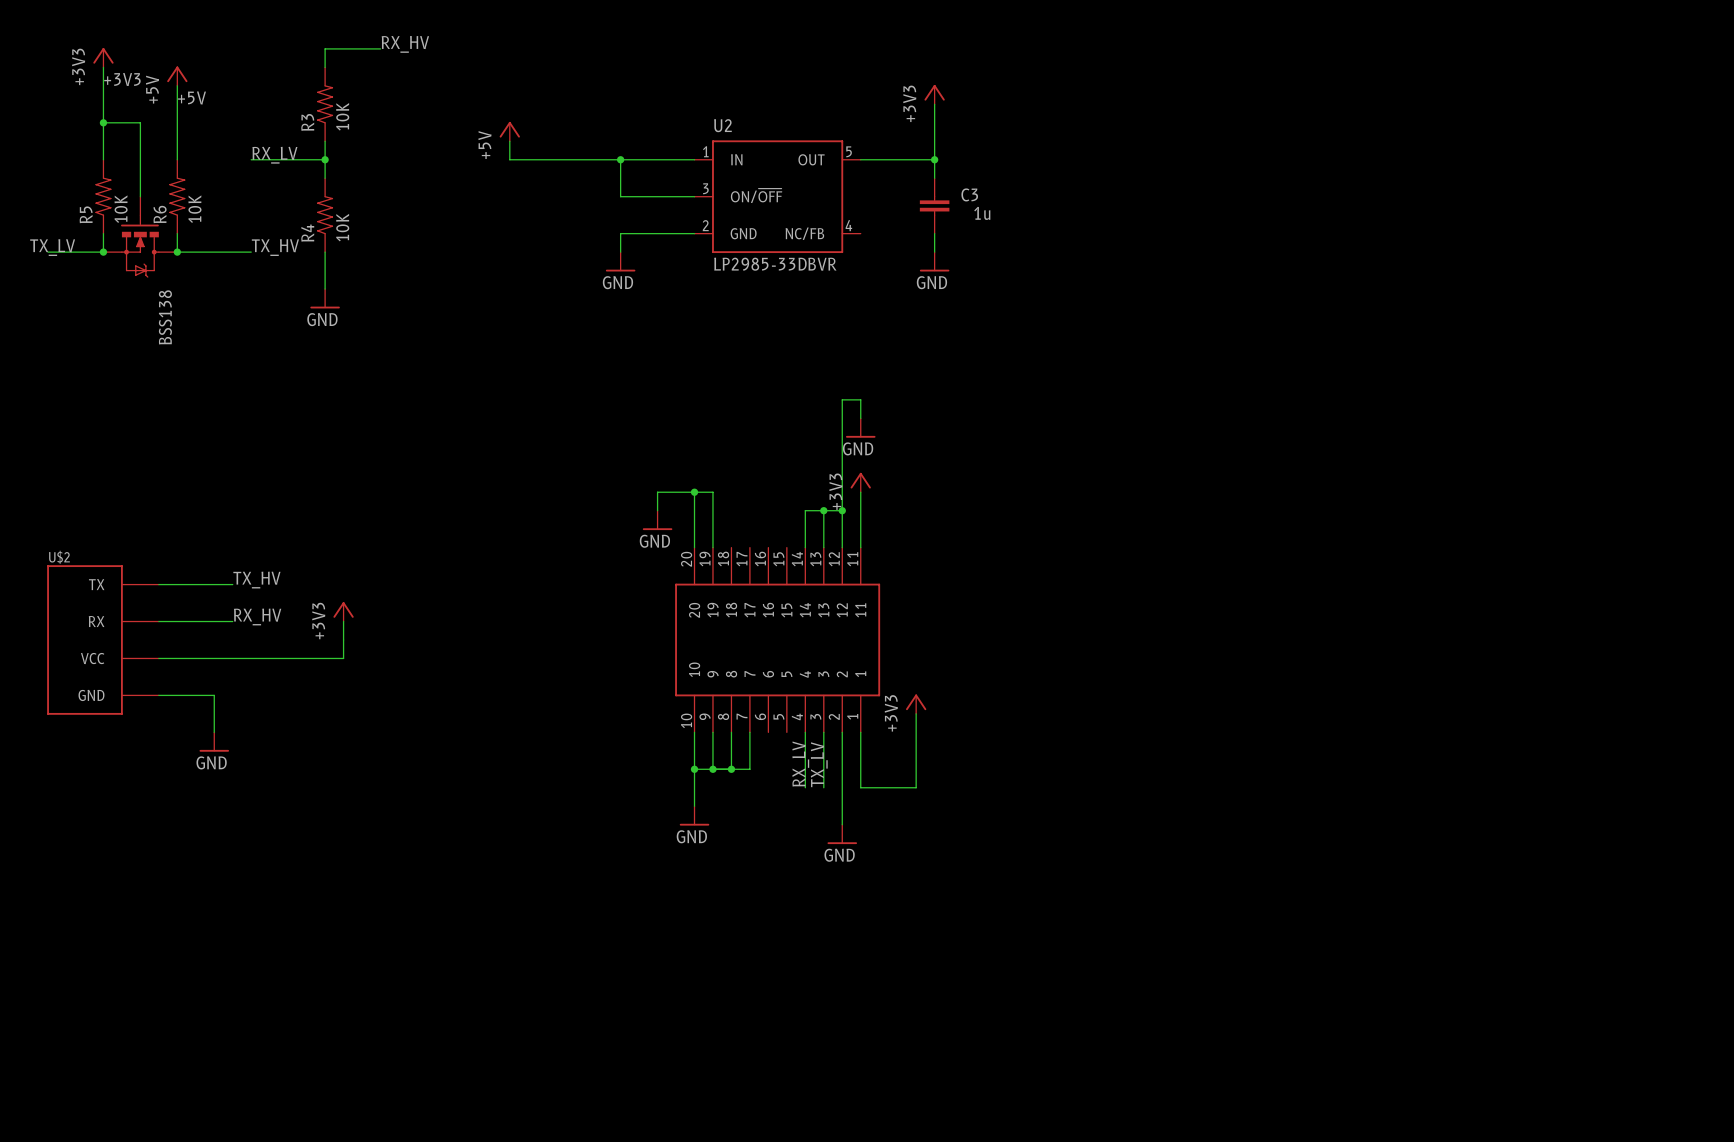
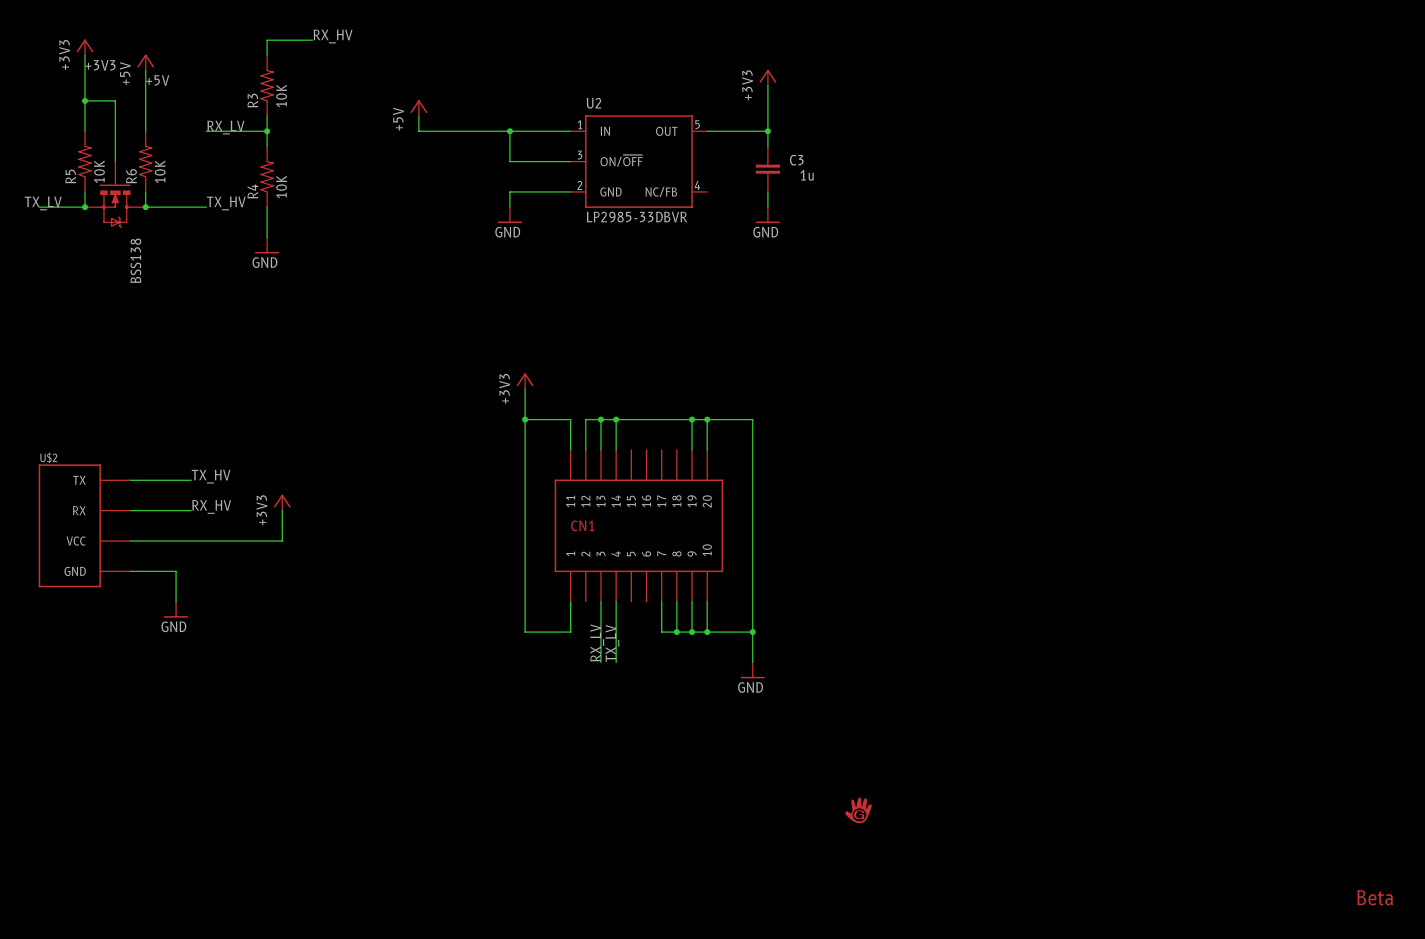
wire: (860, 418) (860, 399) (842, 399) (842, 510) -> (752, 586) (752, 419) (692, 419)
power symbol: GND (860, 428) -> none
power symbol: none -> +3V3 (525, 381)
wire: none -> (525, 389) (525, 632) (570, 632)
power symbol: +3V3 (860, 482) -> none
wire: (694, 492) (694, 510) -> (525, 419) (570, 419)
junction: (694, 492) -> none
wire: (860, 492) (860, 510) -> none
junction: none -> (525, 419)
wire: (657, 510) (657, 492) (712, 492) (712, 510) -> none
wire: none -> (600, 419) (600, 449)
junction: none -> (600, 419)
junction: none -> (616, 419)
wire: (805, 510) (805, 547) -> (661, 419) (585, 419)
wire: (823, 510) (823, 547) -> (616, 419) (616, 449)
junction: (823, 510) -> none
junction: none -> (707, 419)
power symbol: GND (657, 520) -> none
CN1 symbol: [675, 547, 881, 733] -> [554, 449, 724, 602]
CN1 name: none -> CN1 (582, 525)
power symbol: +3V3 (916, 704) -> none
wire: (712, 732) (712, 769) -> (600, 632) (600, 662)
label position: RX_LV (800, 764) -> RX_LV (597, 642)
label position: TX_LV (819, 764) -> TX_LV (612, 643)
junction: (694, 769) -> none
junction: (712, 769) -> none
junction: (731, 769) -> none
wire: (749, 769) (694, 769) (694, 806) -> (616, 632) (616, 662)
wire: (805, 769) (805, 787) -> (661, 632) (752, 632)
wire: (823, 769) (823, 787) -> none
junction: none -> (676, 632)
wire: (842, 769) (842, 824) -> none
junction: none -> (692, 632)
wire: (860, 769) (860, 787) (916, 787) -> (752, 662) (752, 647)
junction: none -> (707, 632)
junction: none -> (752, 632)
power symbol: GND (694, 815) -> none
power symbol position: GND (842, 834) -> GND (752, 670)
part: none -> (858, 810)
text: none -> Beta (1375, 897)

